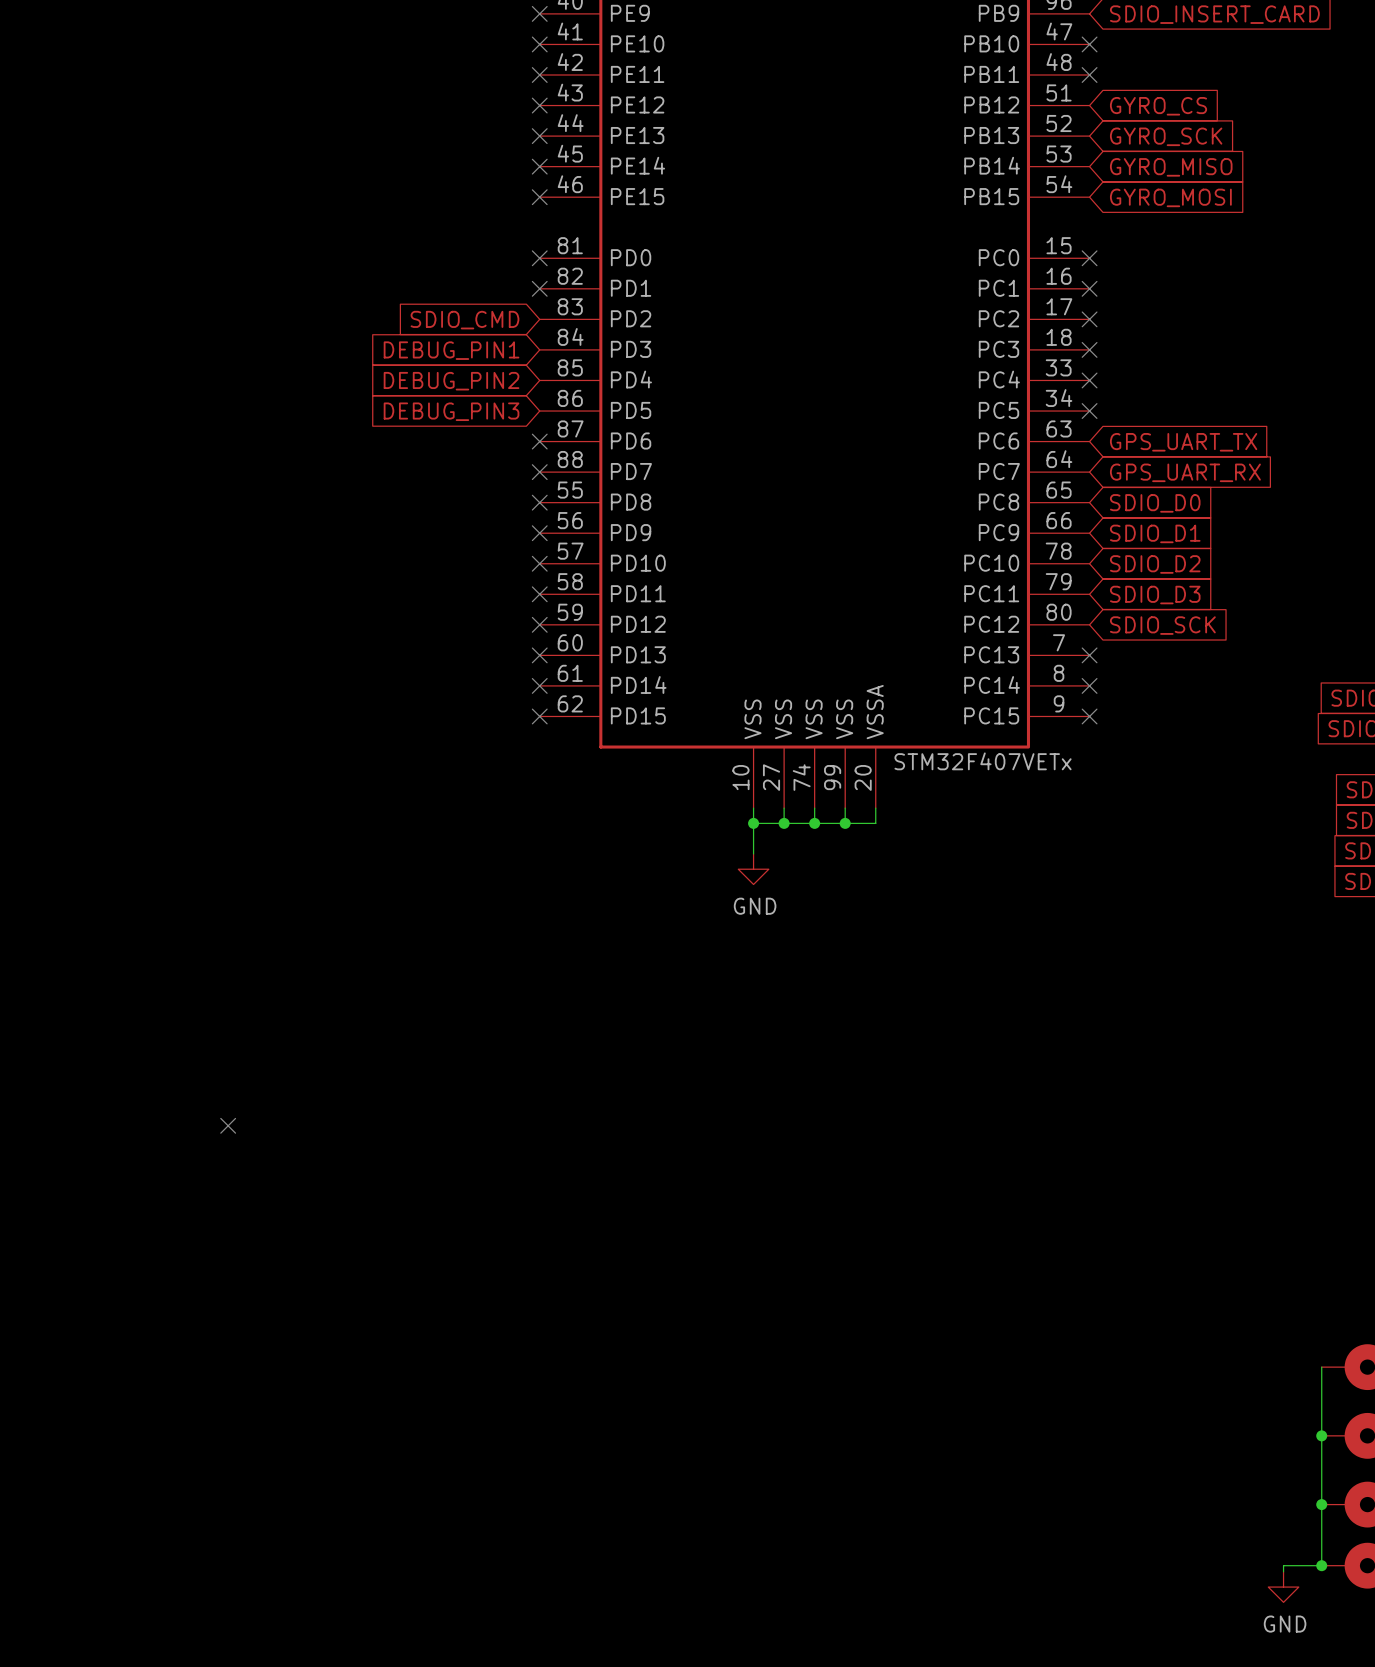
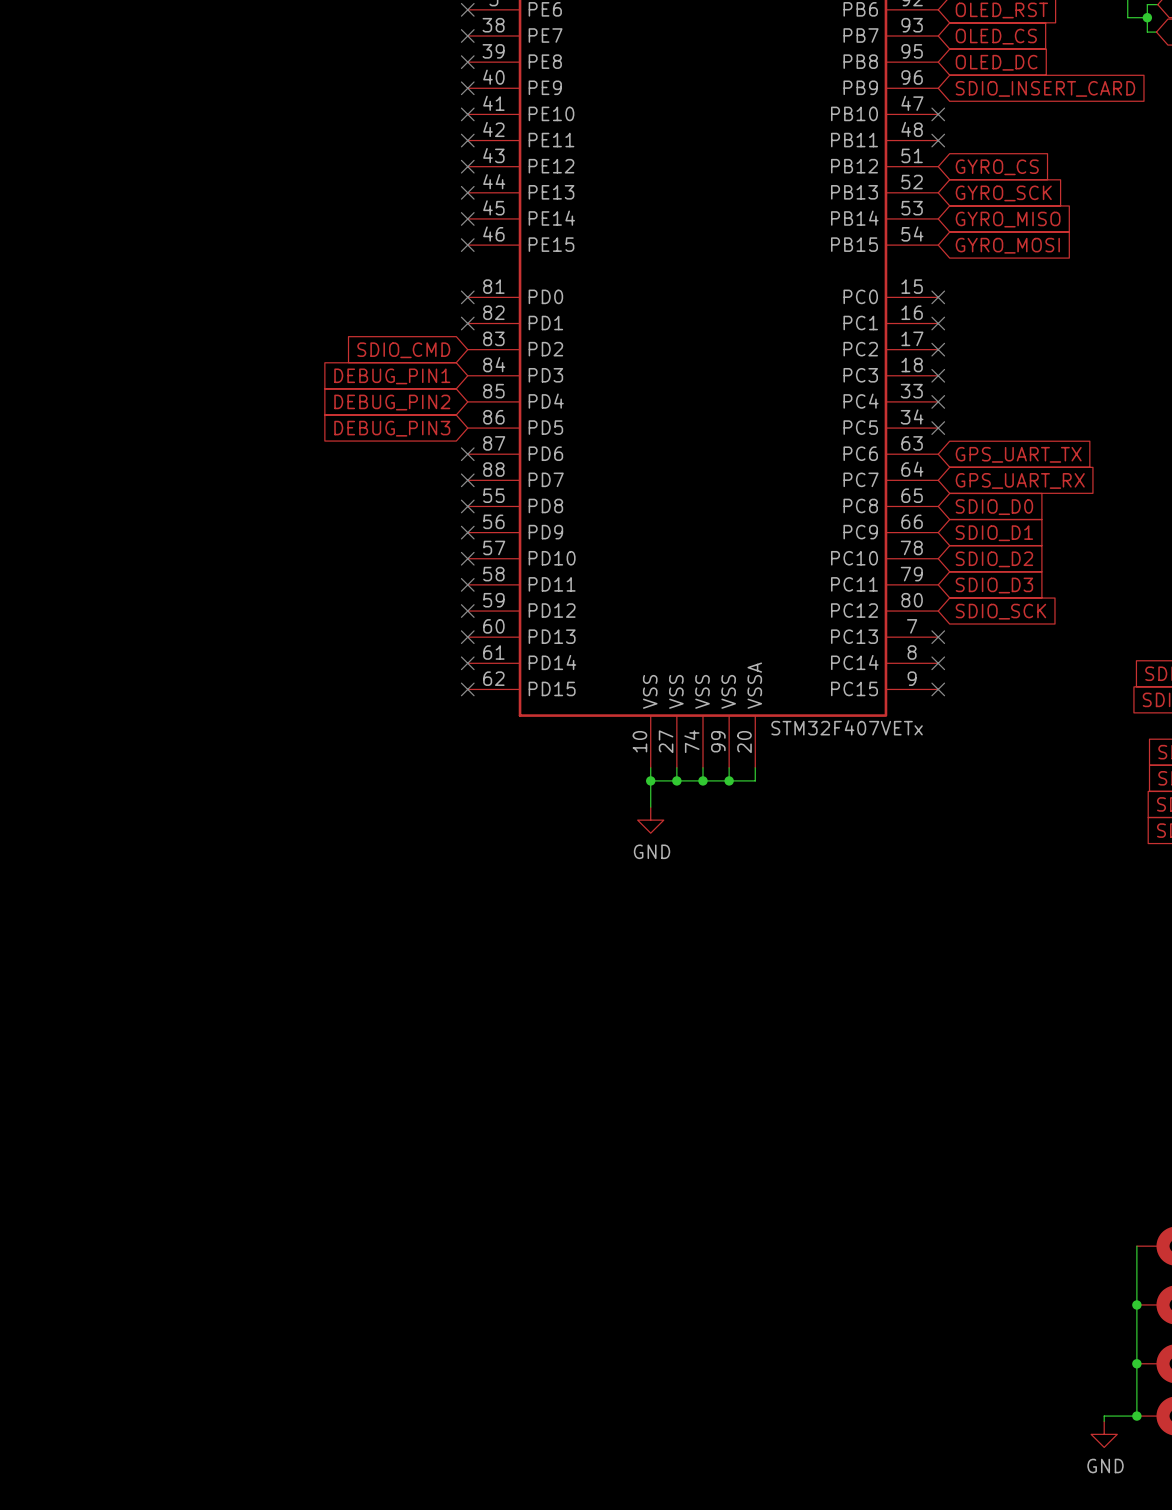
no-connect mark: (228, 1125) -> none

